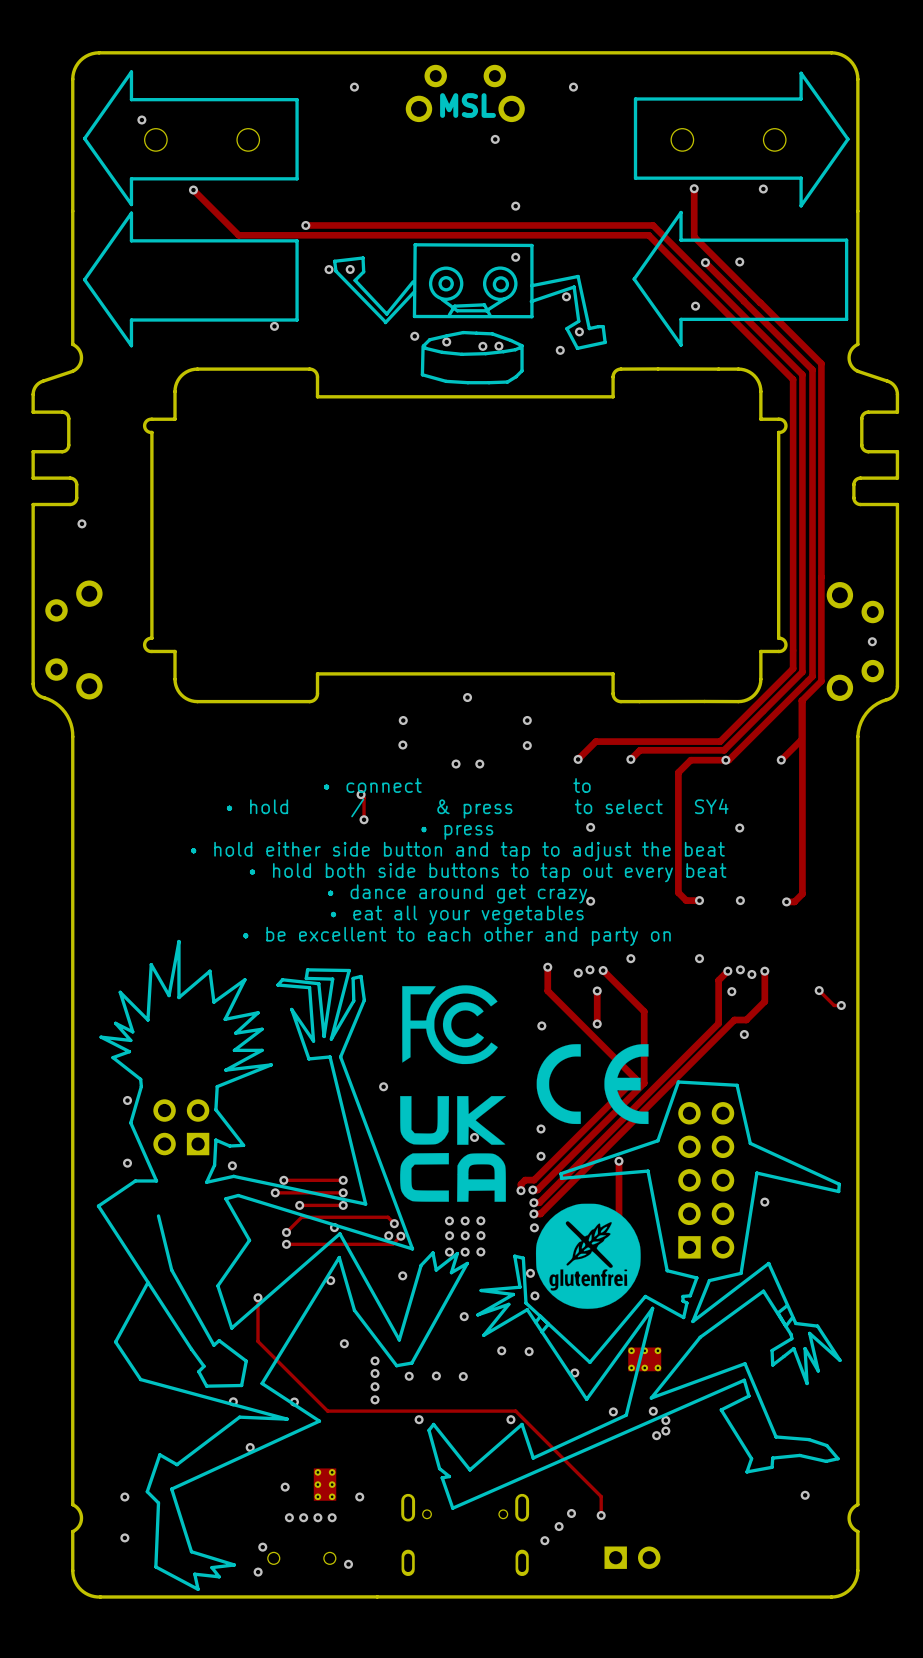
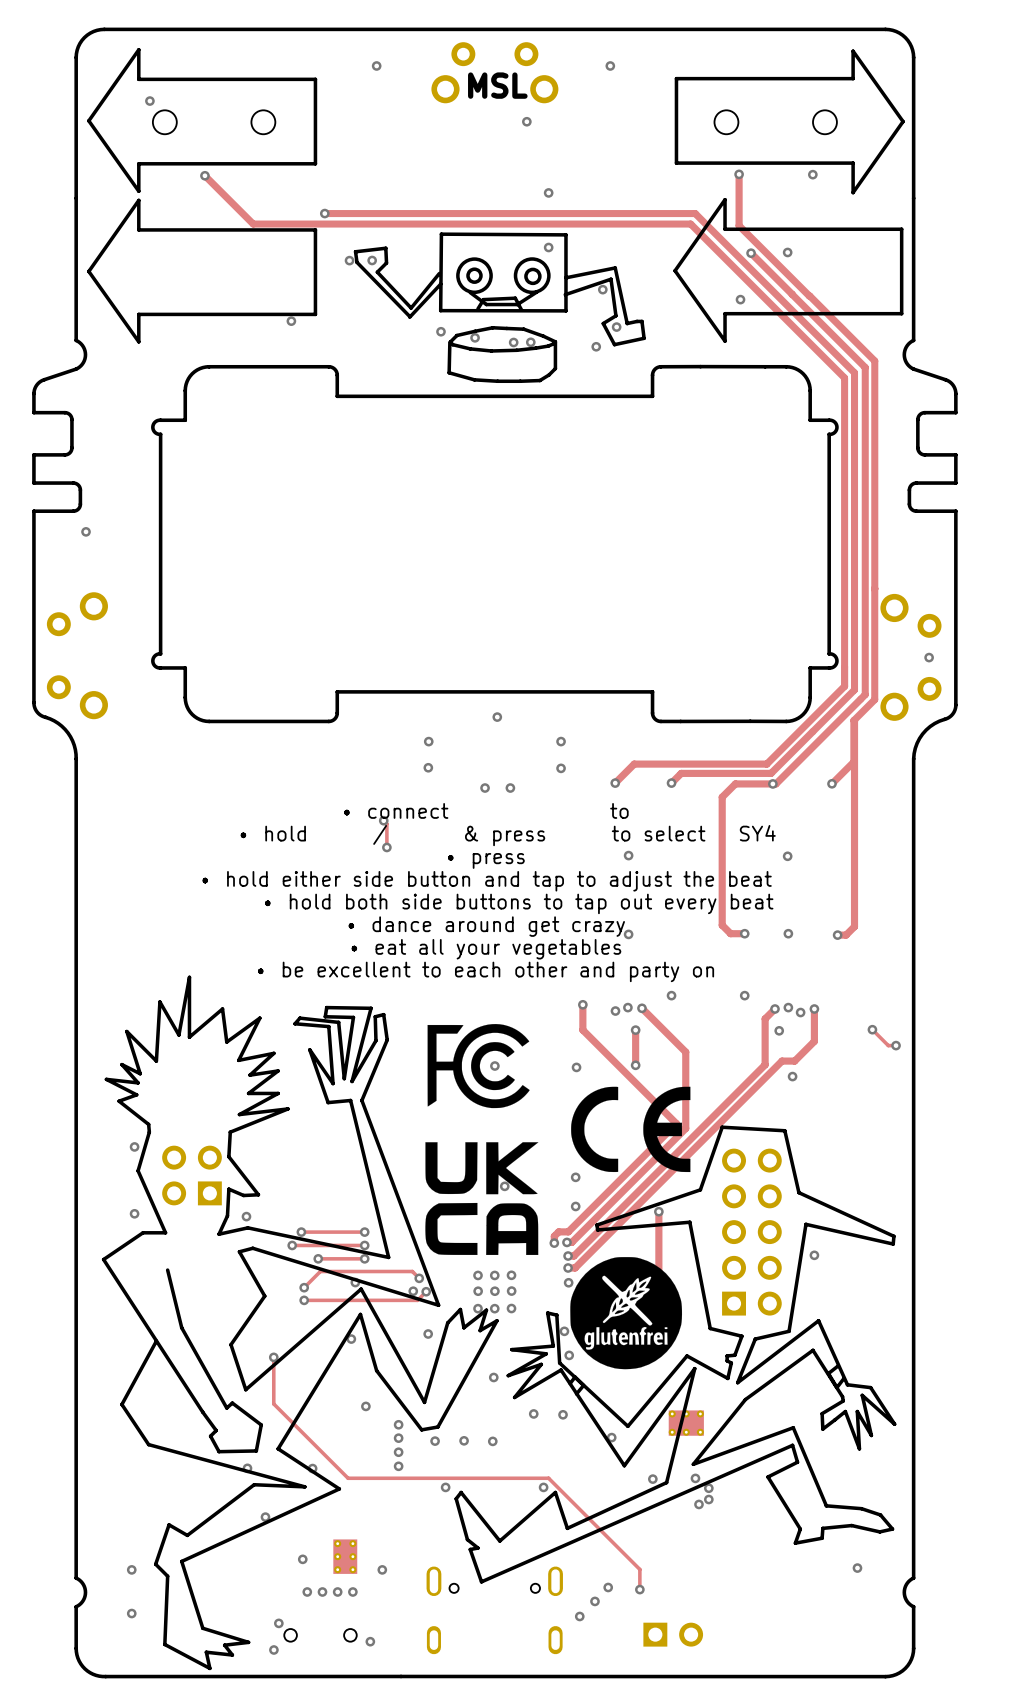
via: none -> (494, 1066)
via: (383, 1086) -> none

